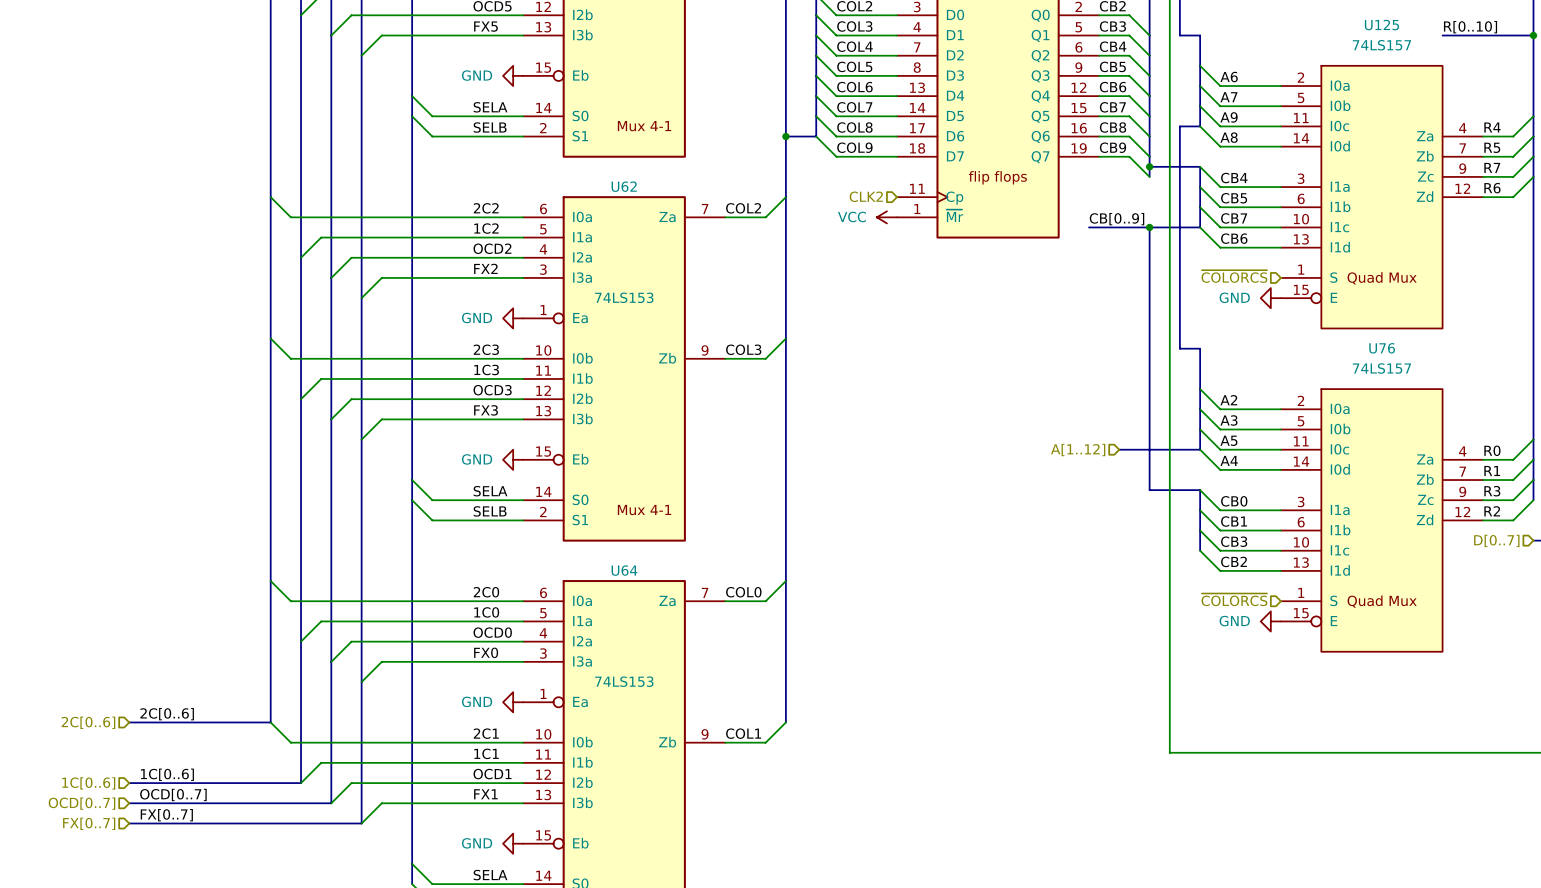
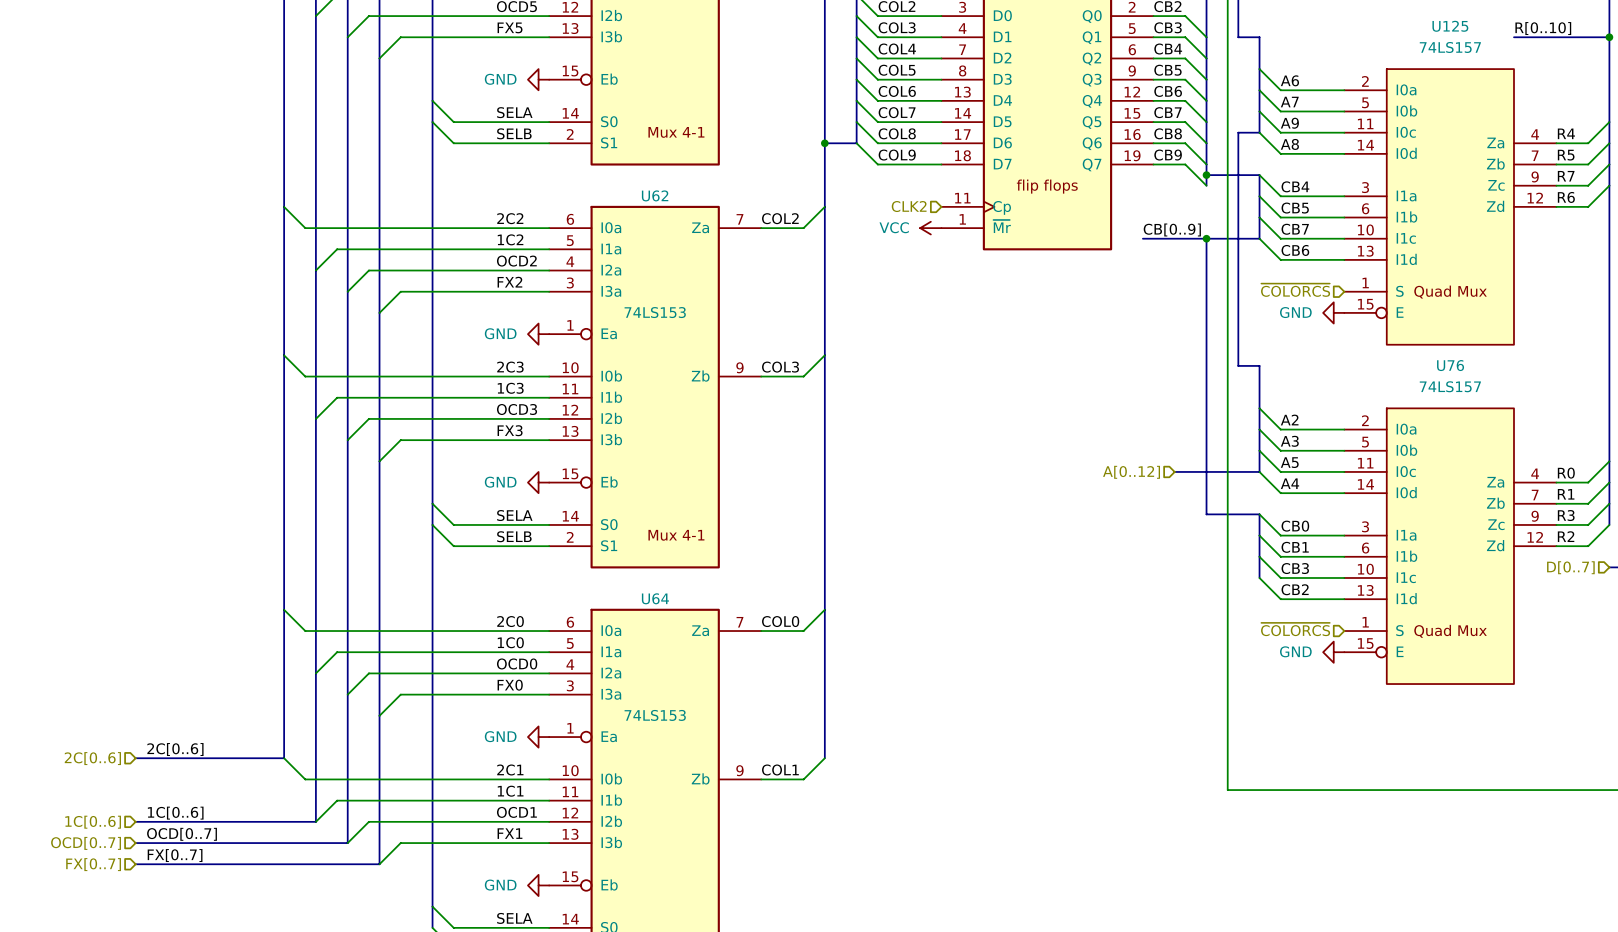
hierarchical label: A[1..12] (1078, 450) -> A[0..12] (1131, 472)

